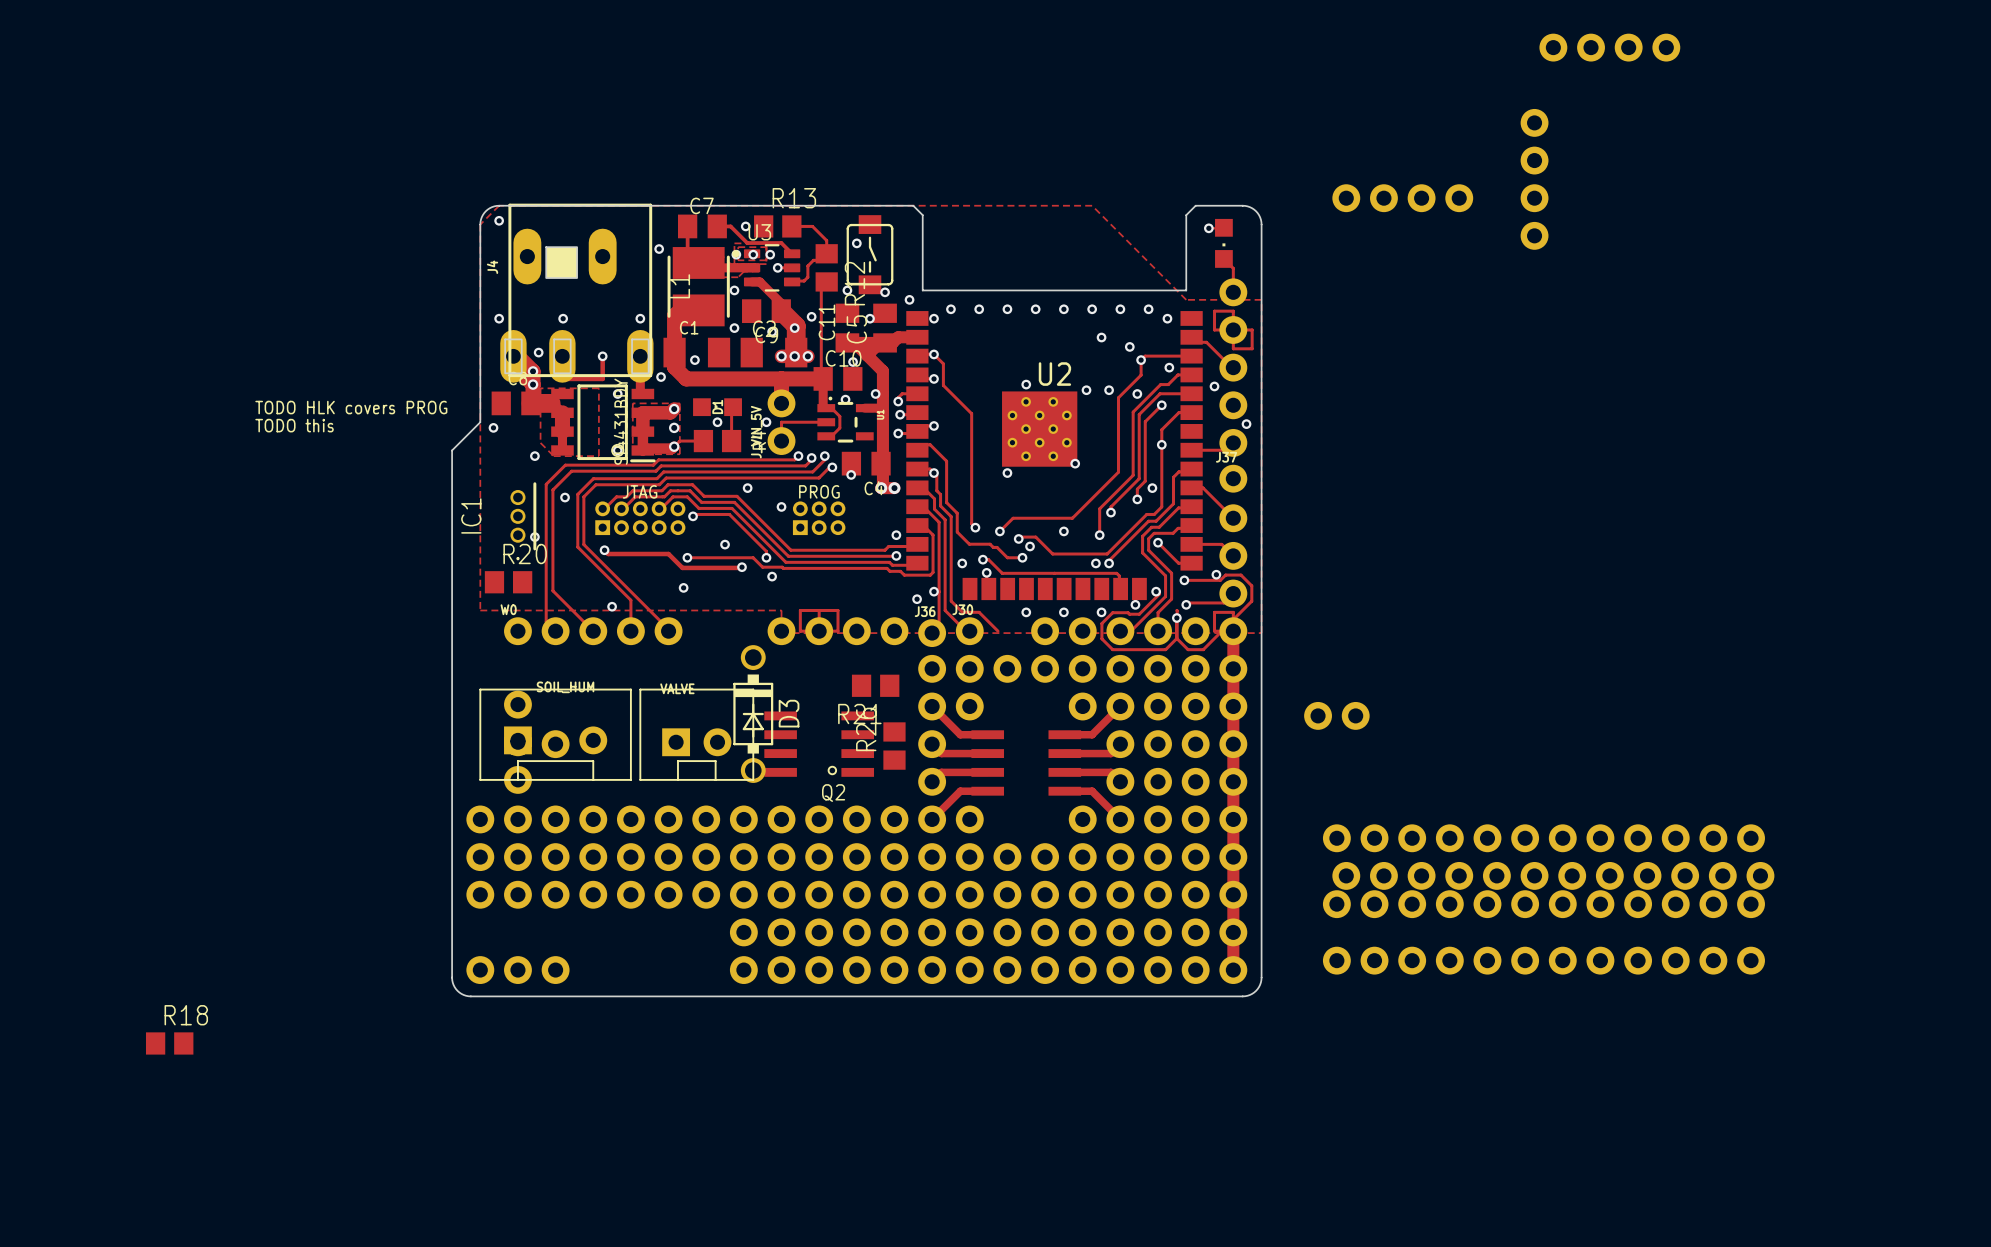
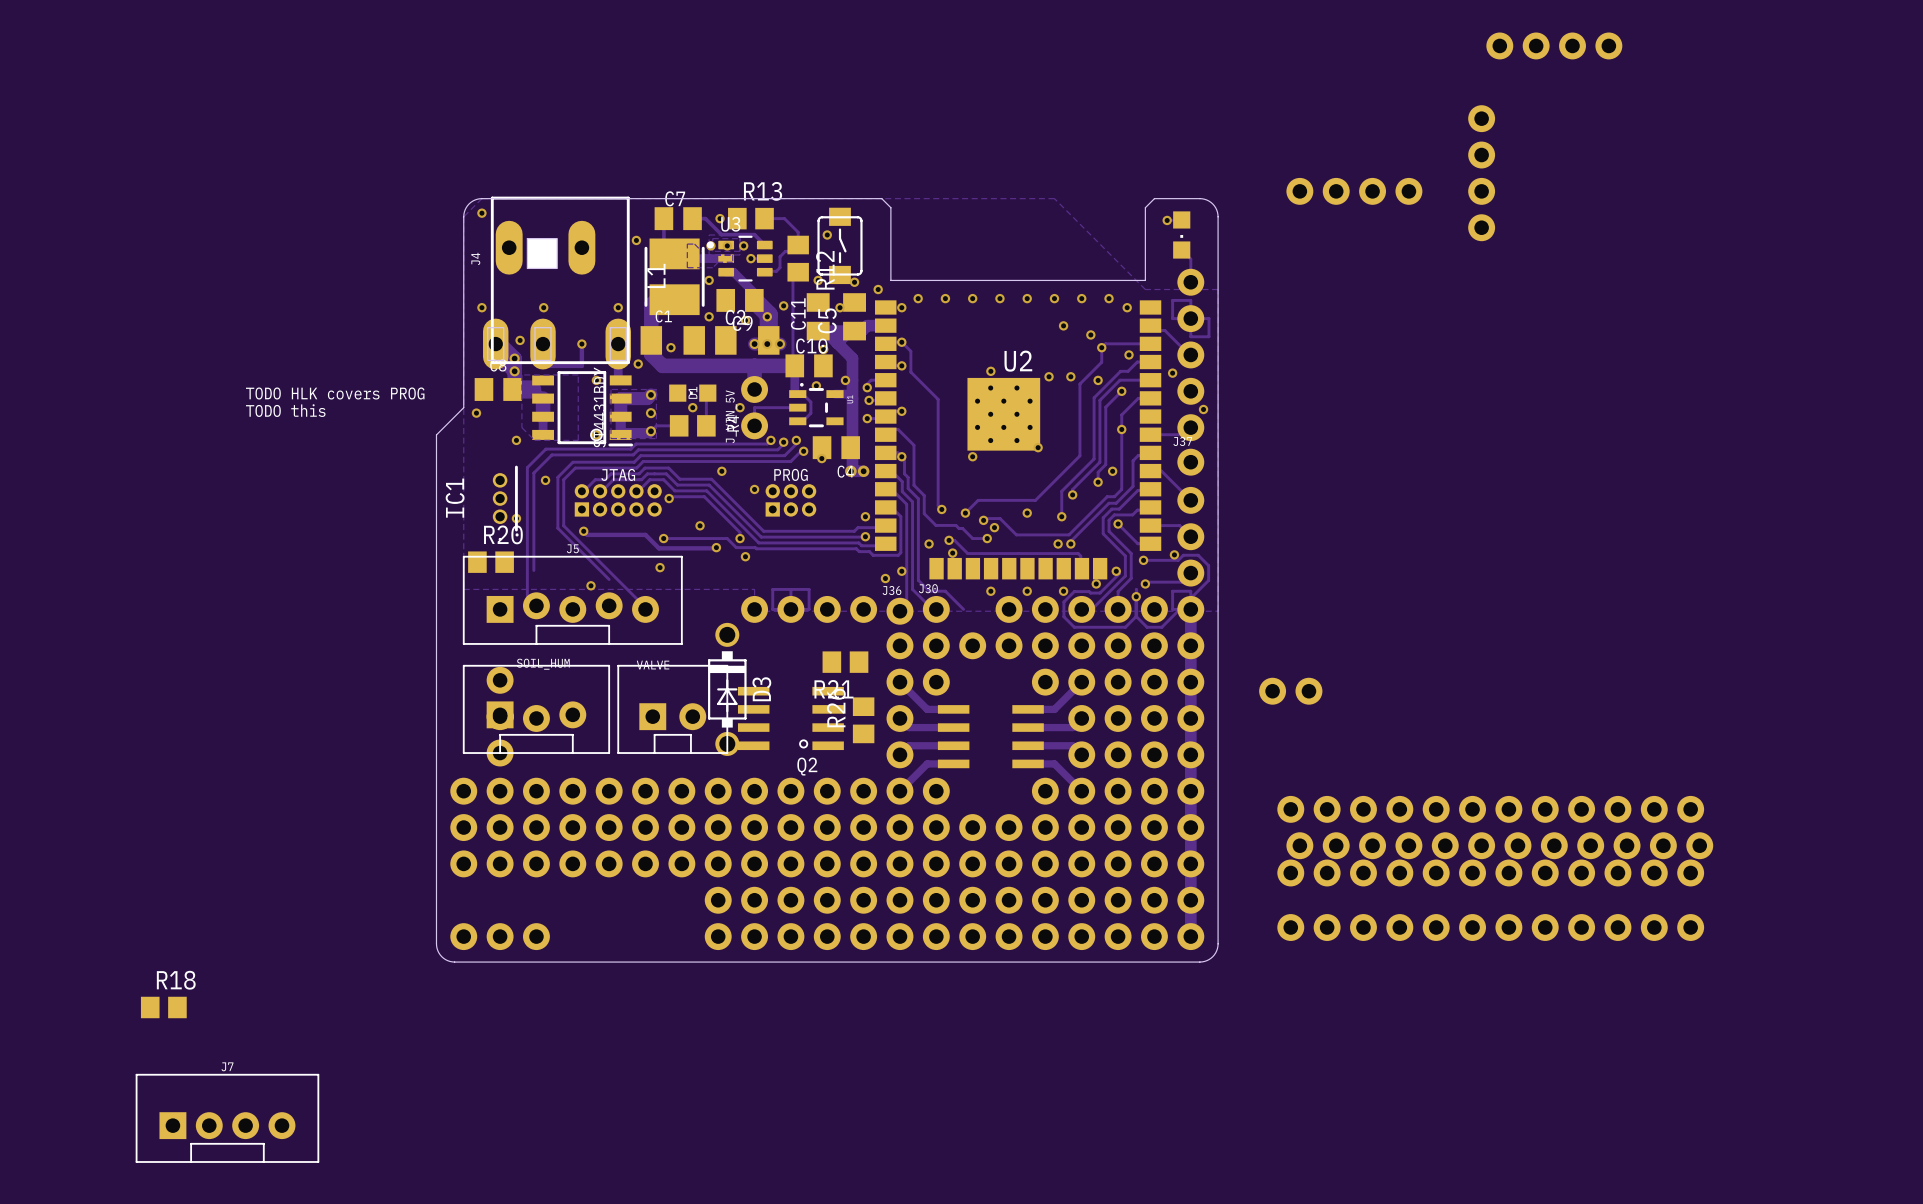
track: (552, 590) (593, 631) -> none
track: (630, 600) (630, 631) -> none
J5: none -> (572, 600)
W0: (517, 631) -> none
part: (555, 631) -> none
part: (593, 631) -> none
part: (630, 631) -> none
J7: none -> (227, 1118)

